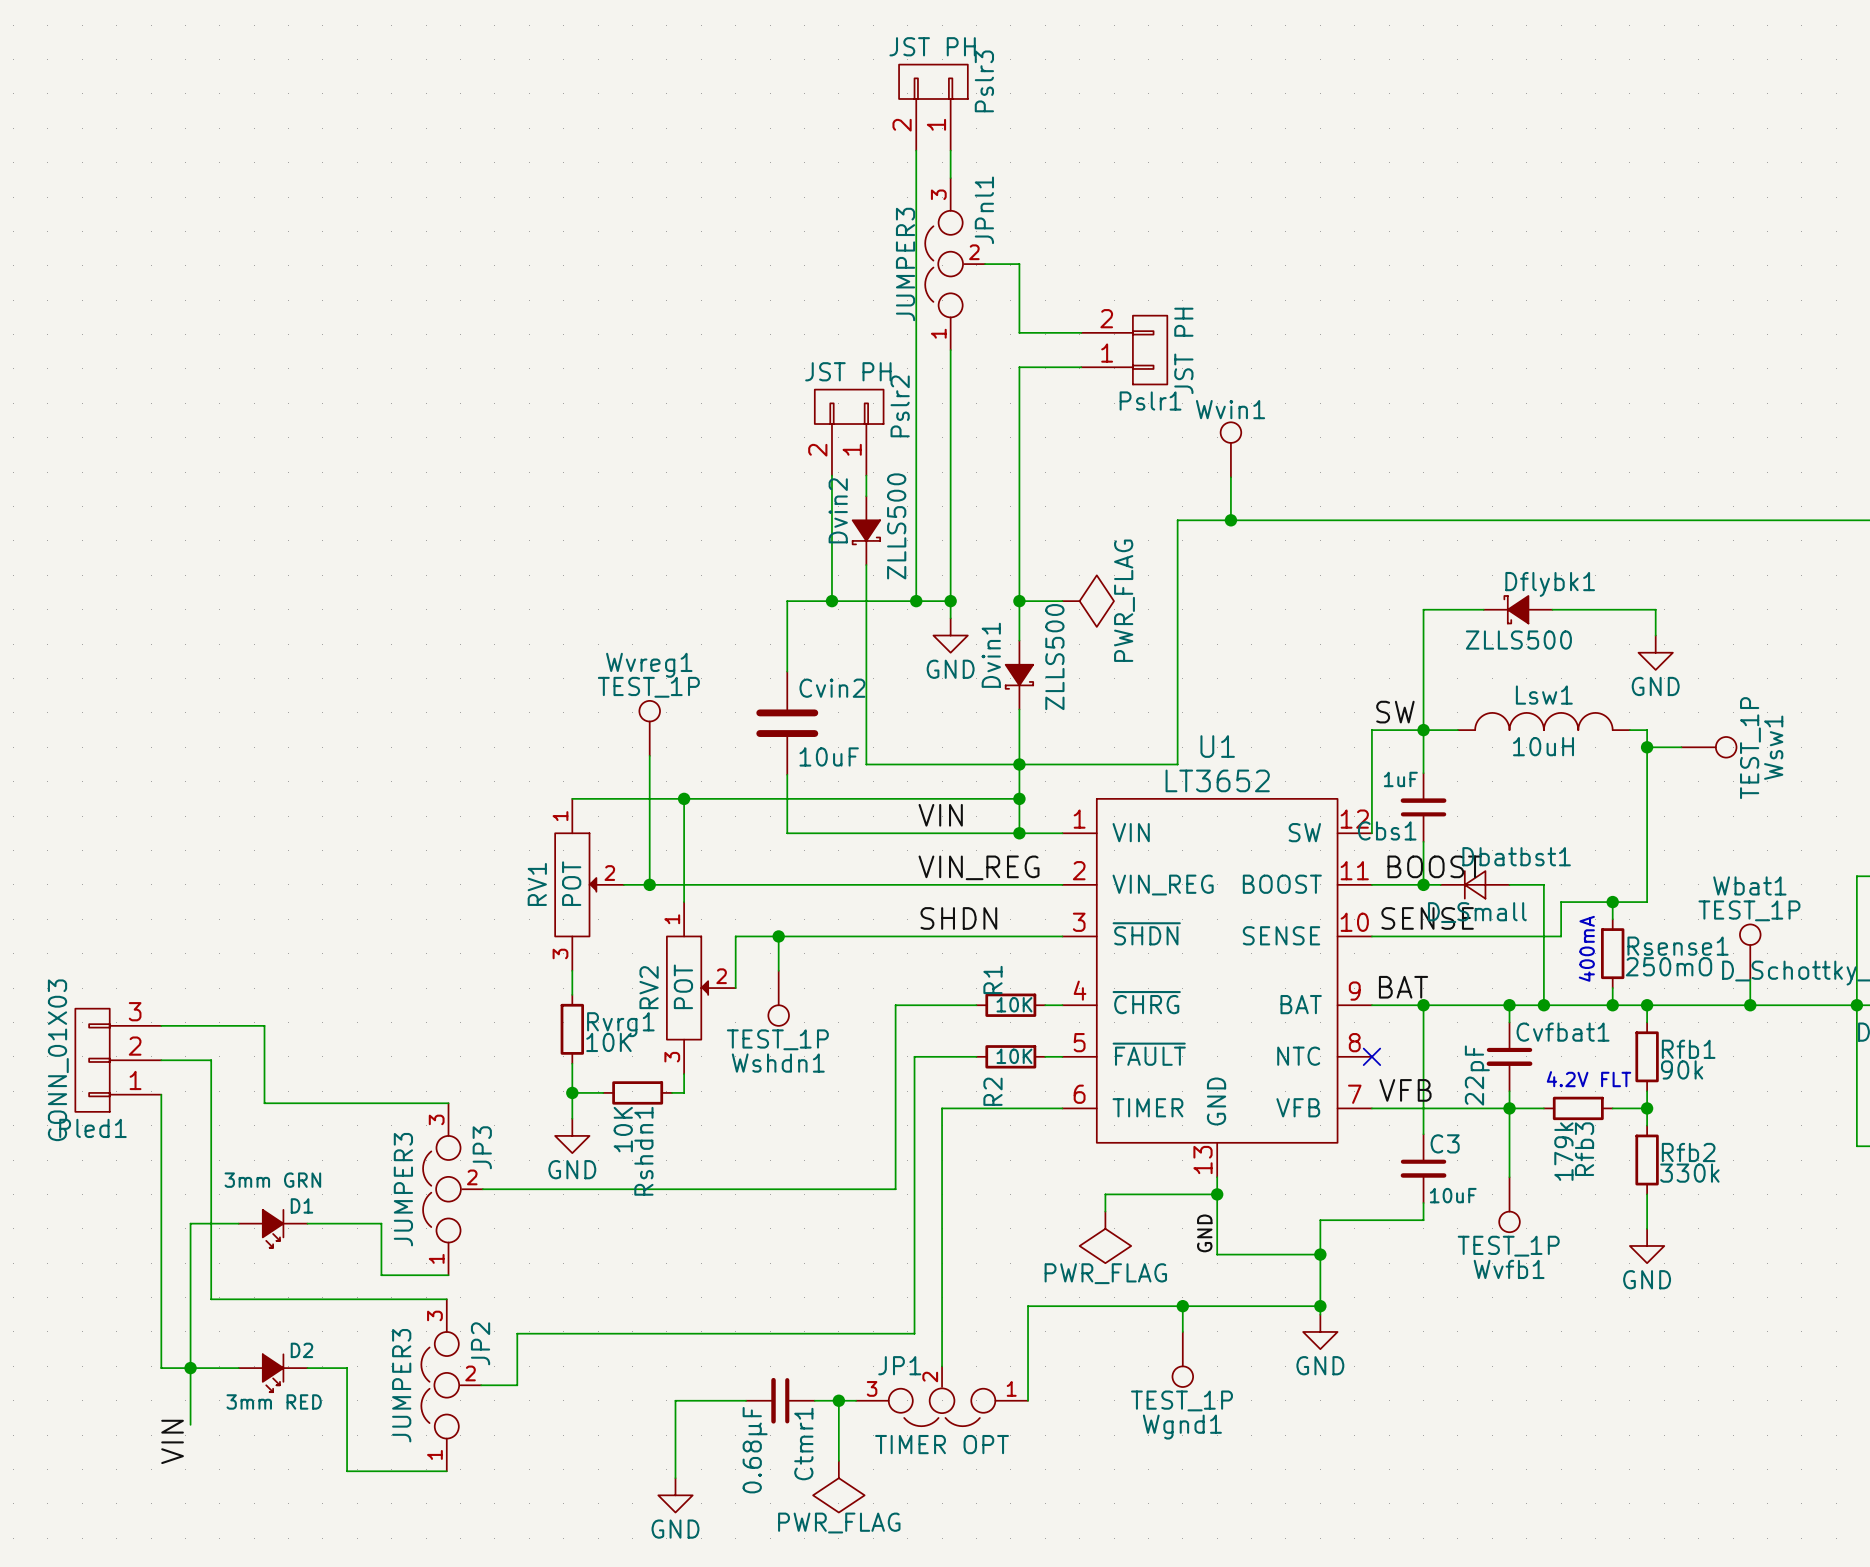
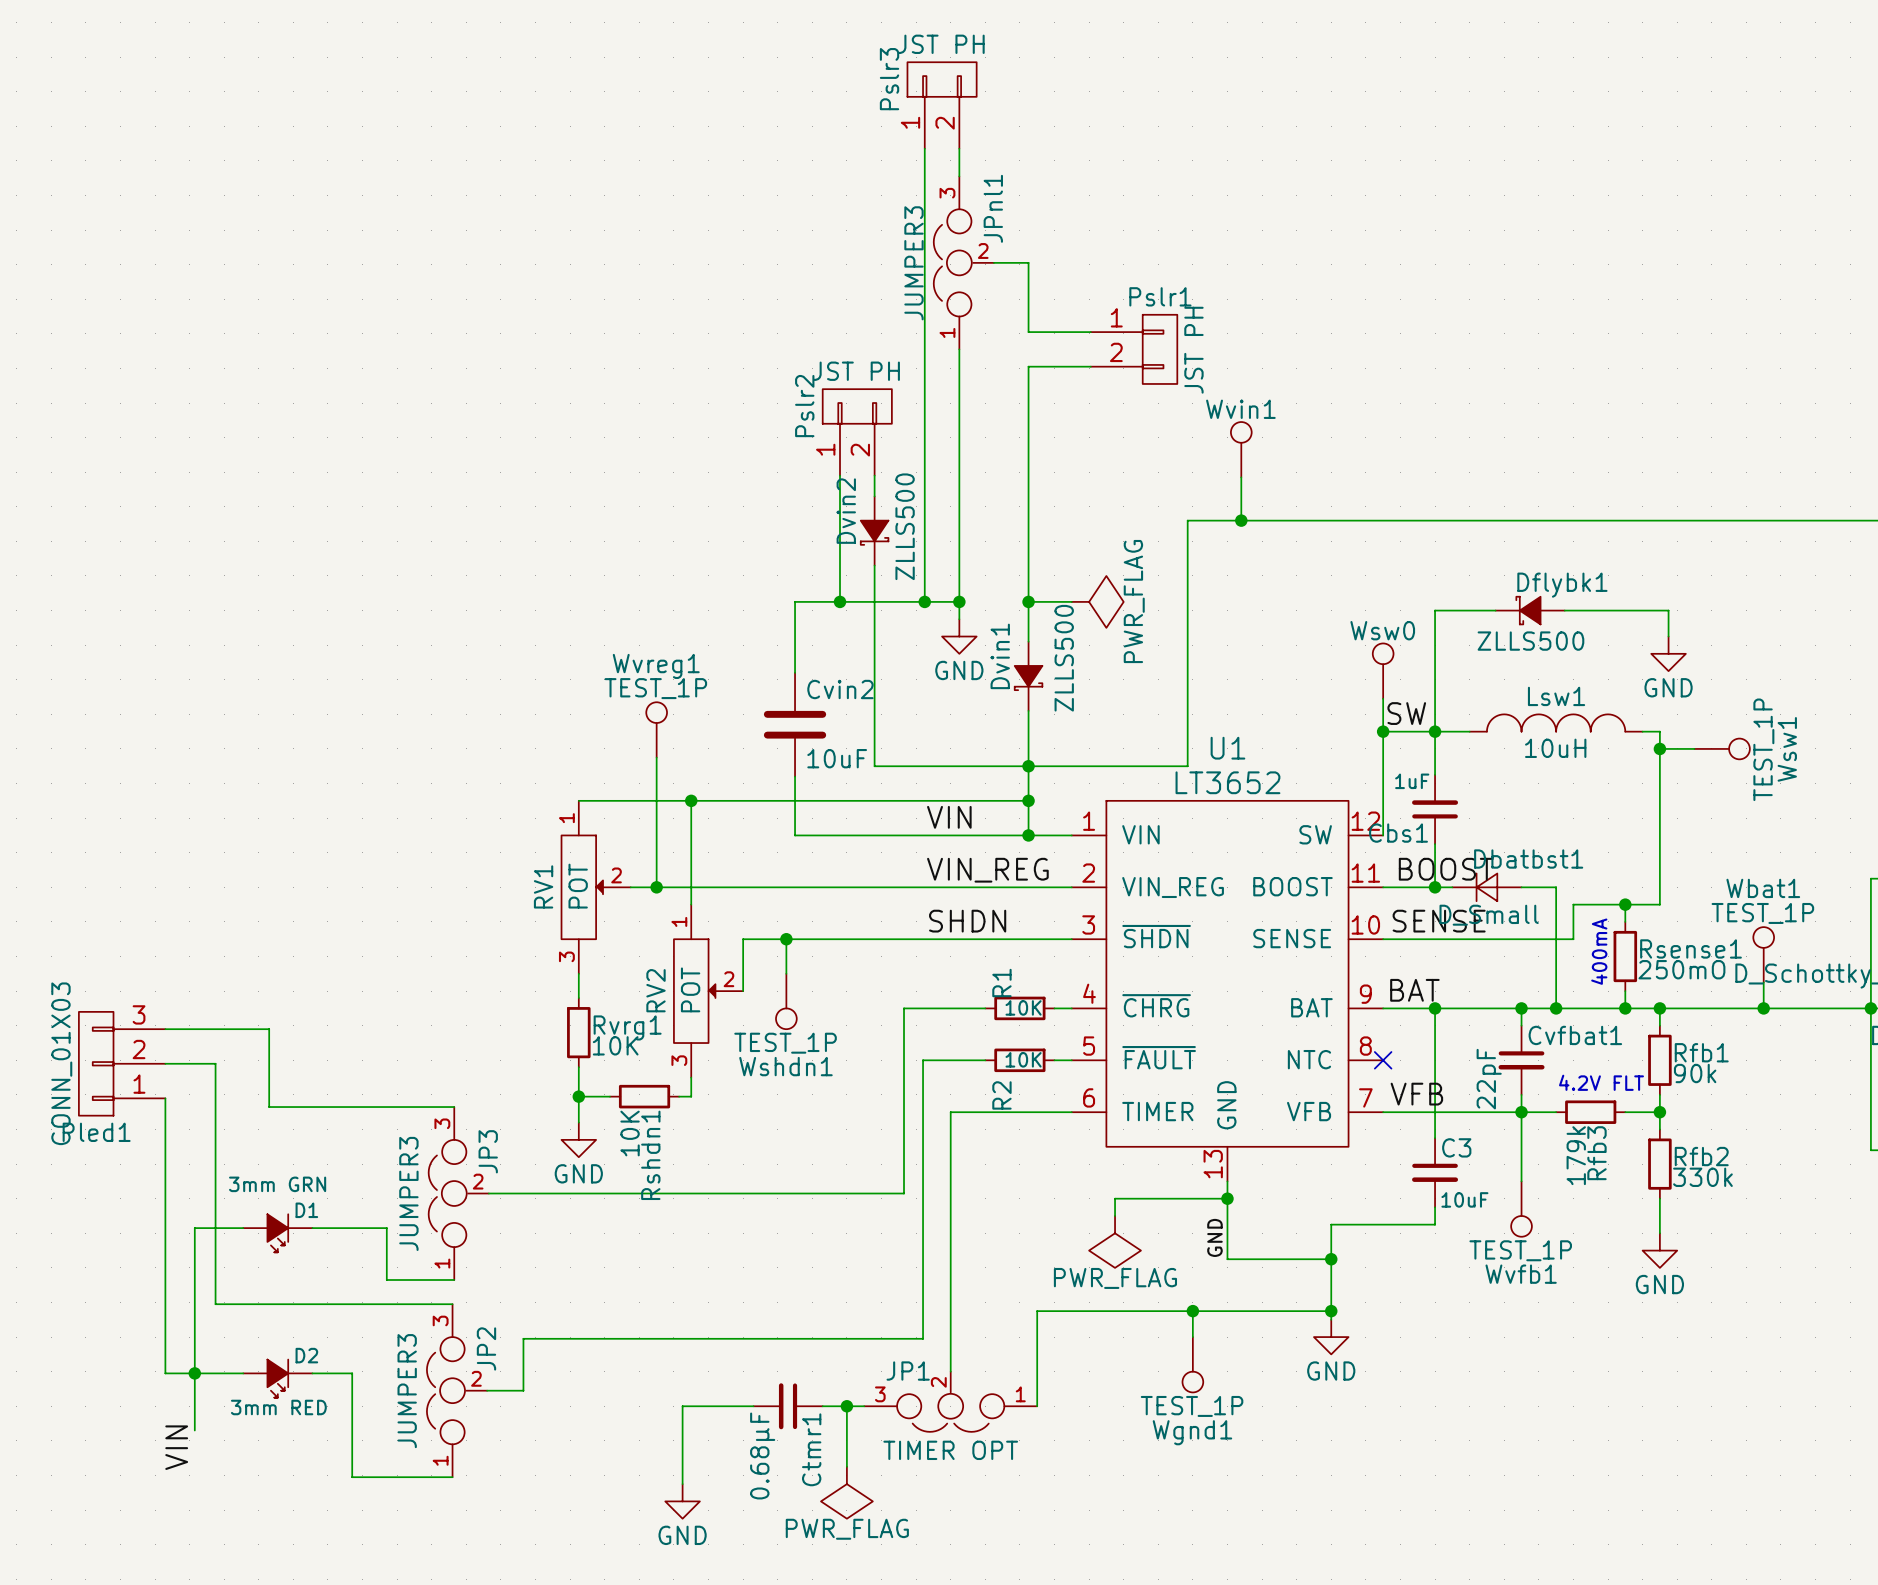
Pslr3 flip: as is (933, 81) -> left-right (942, 79)
Pslr1 flip: as is (1150, 350) -> up-down (1160, 349)
Pslr2 flip: as is (849, 406) -> left-right (857, 406)
Wsw0: none -> (1383, 671)
wire: none -> (1383, 698) (1383, 731)
junction: none -> (1383, 731)

